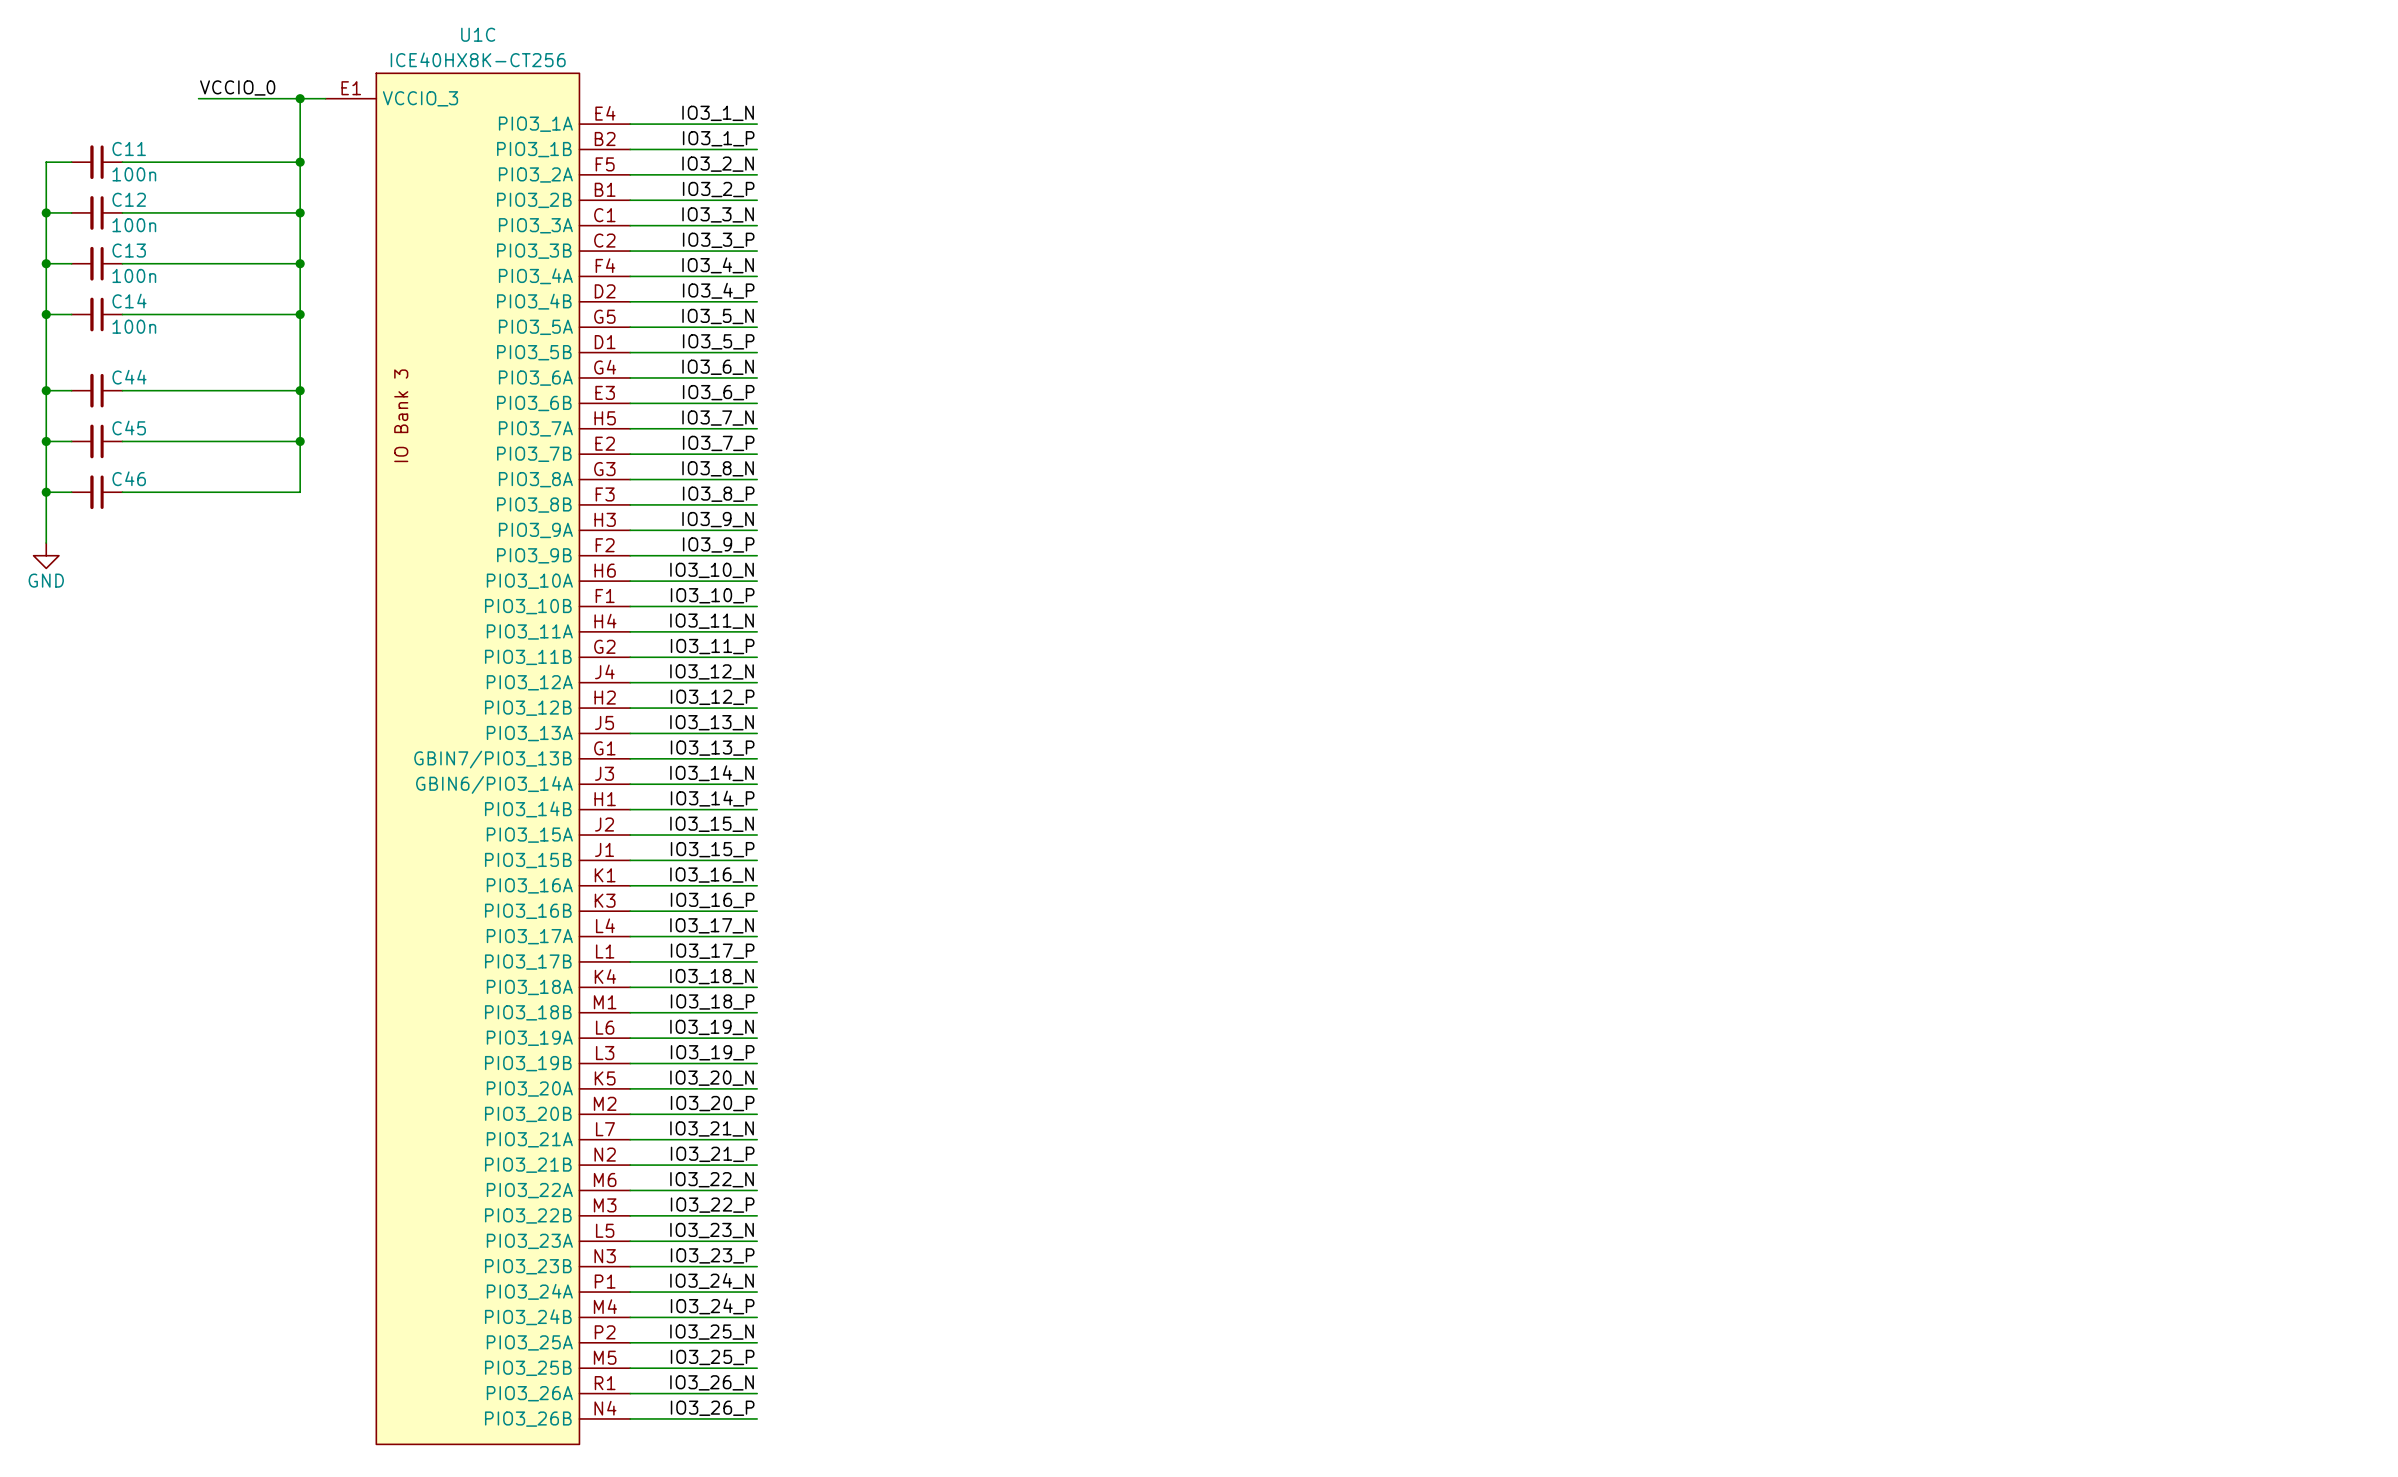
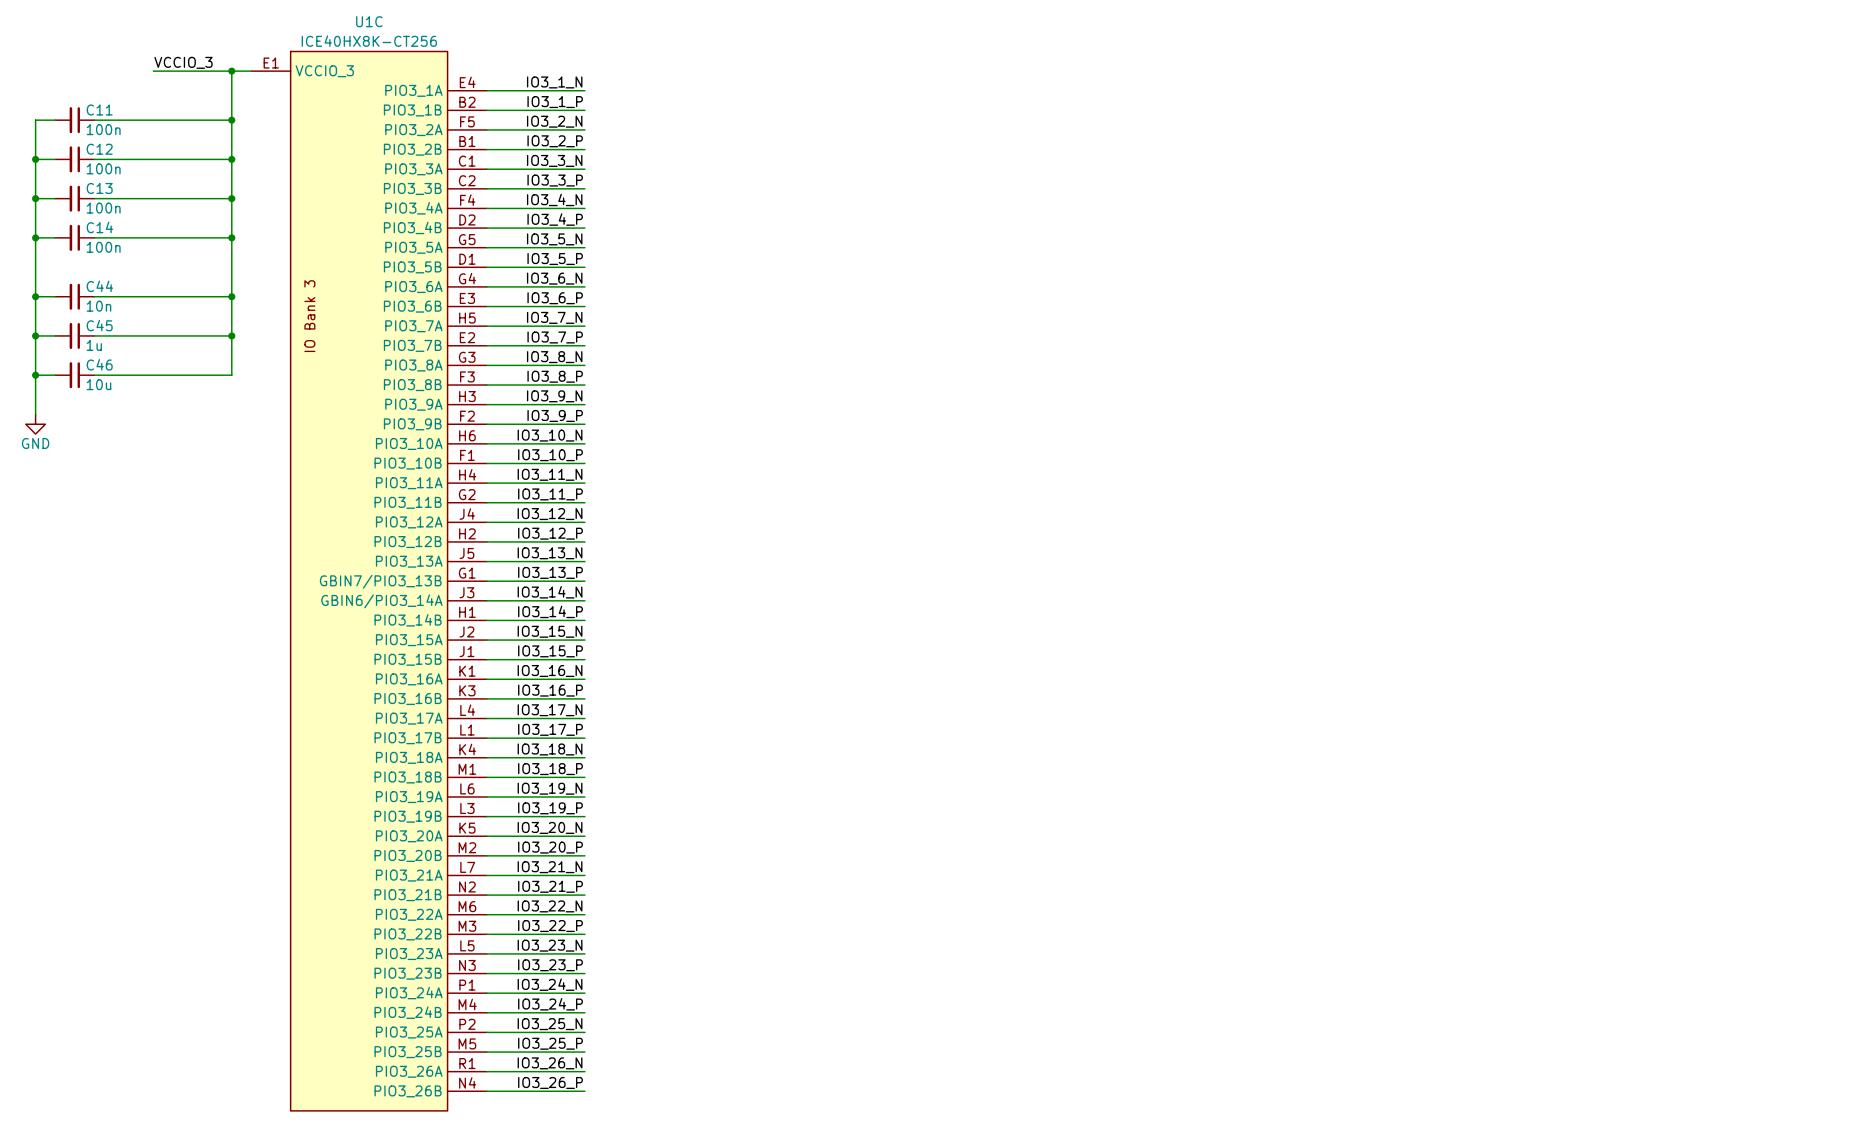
label: VCCIO_0 (237, 87) -> VCCIO_3 (183, 62)
C44 value: none -> 10n (98, 306)
C45 value: none -> 1u (94, 345)
C46 value: none -> 10u (98, 384)

